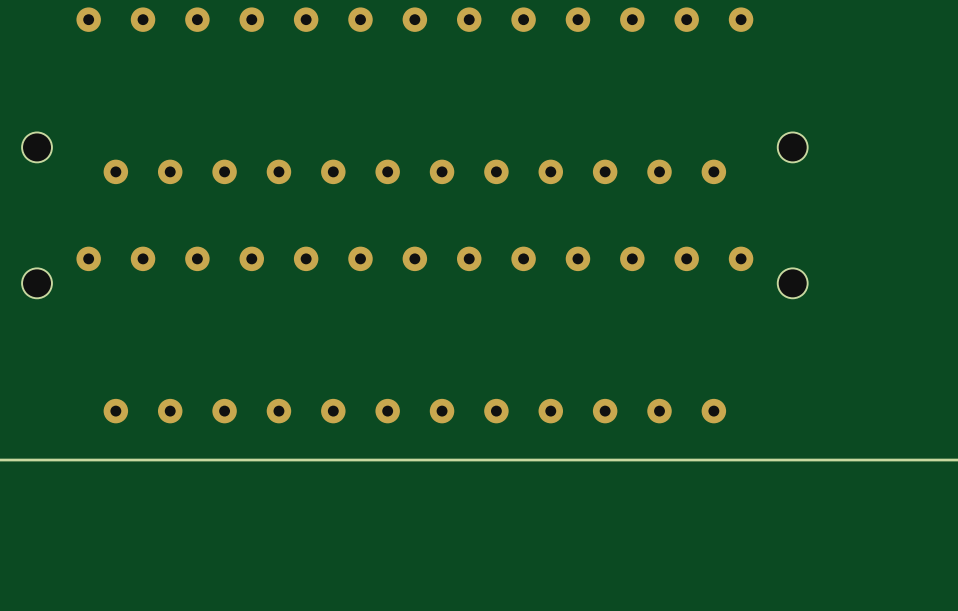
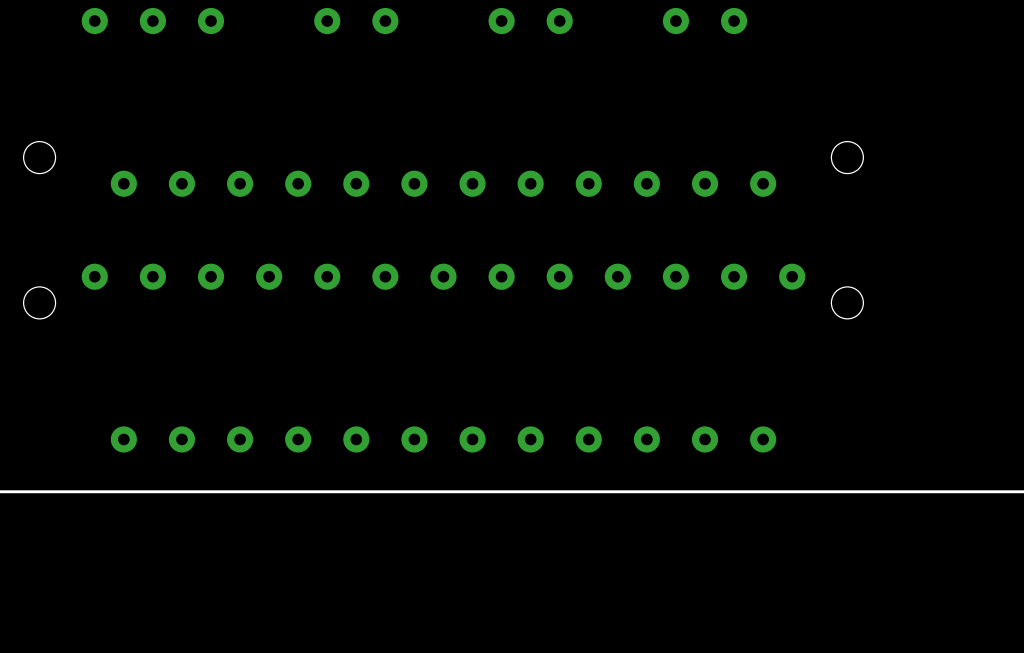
via: (251, 19) -> none
via: (414, 19) -> none
via: (577, 19) -> none
via: (741, 19) -> none

